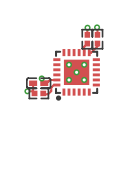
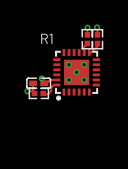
R1 name: none -> R1 (46, 38)

